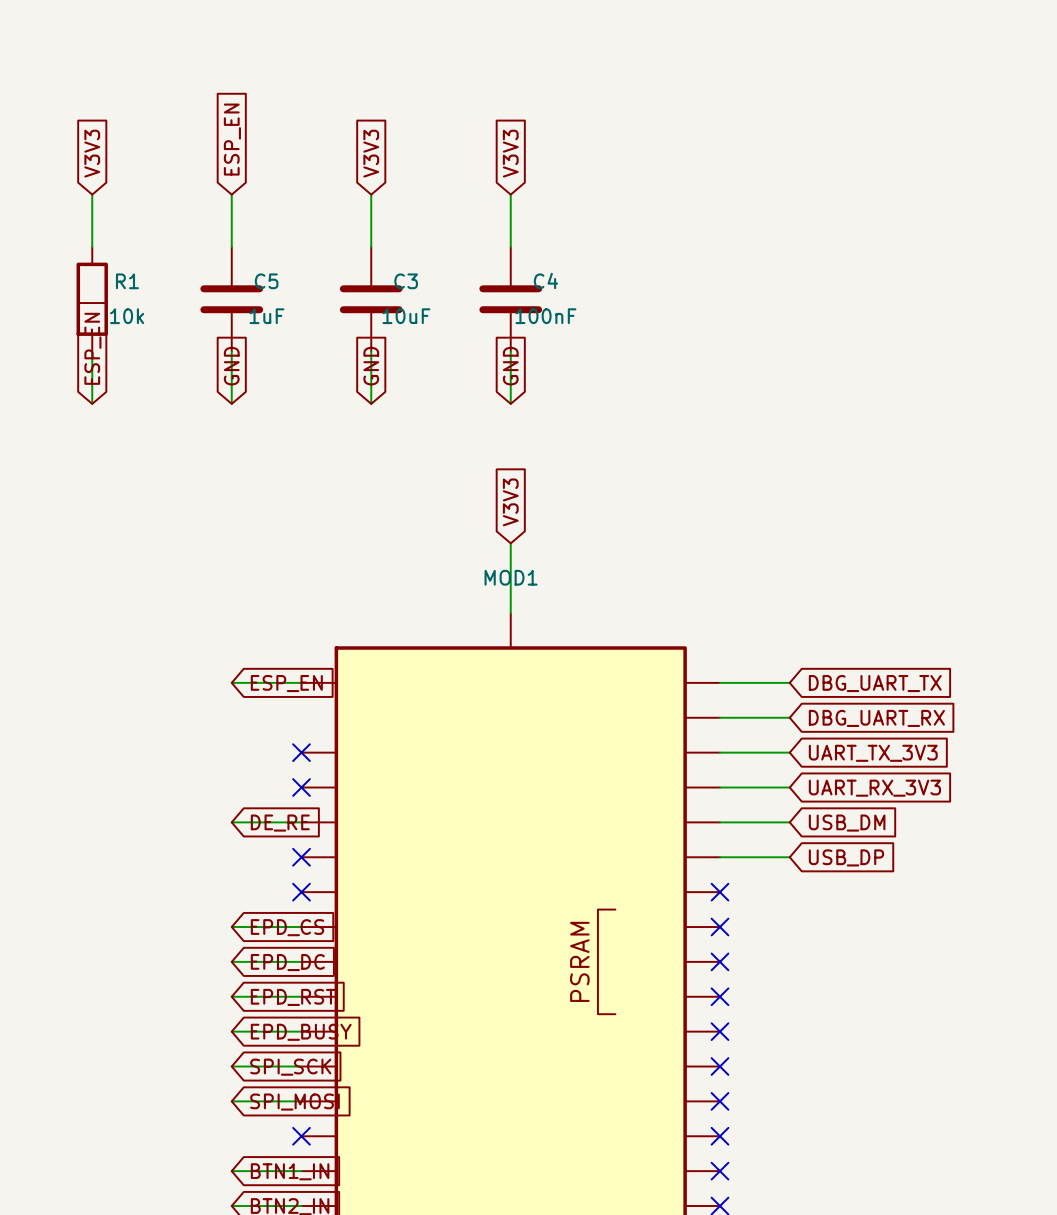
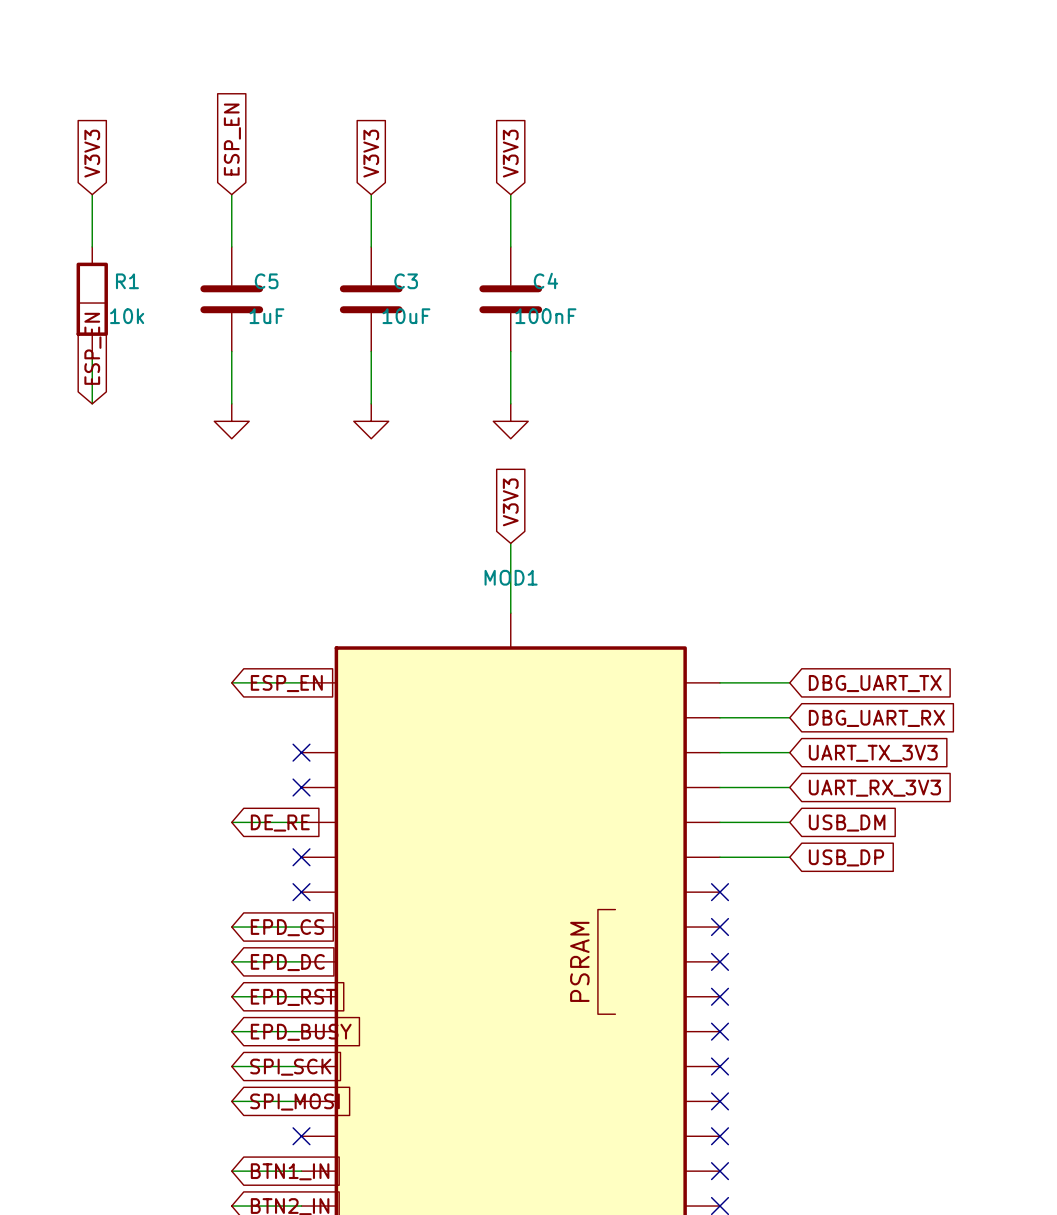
global label: GND (231, 366) -> none
global label: GND (371, 366) -> none
global label: GND (510, 366) -> none
power symbol: none -> (231, 421)
power symbol: none -> (371, 421)
power symbol: none -> (510, 421)

